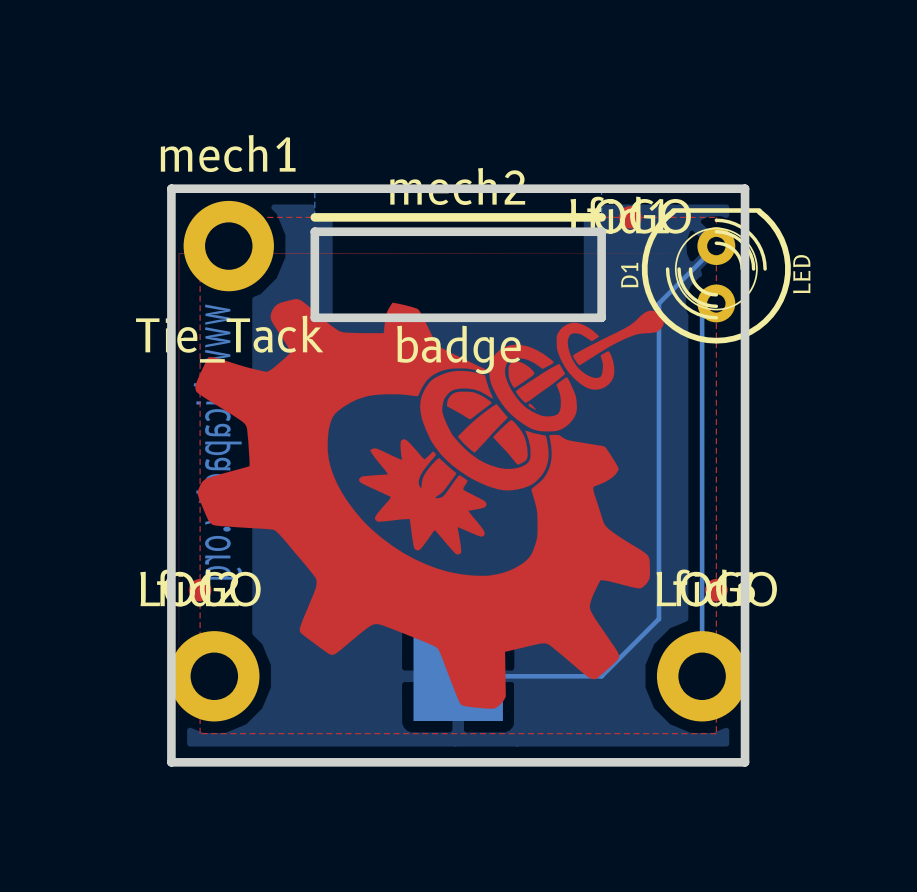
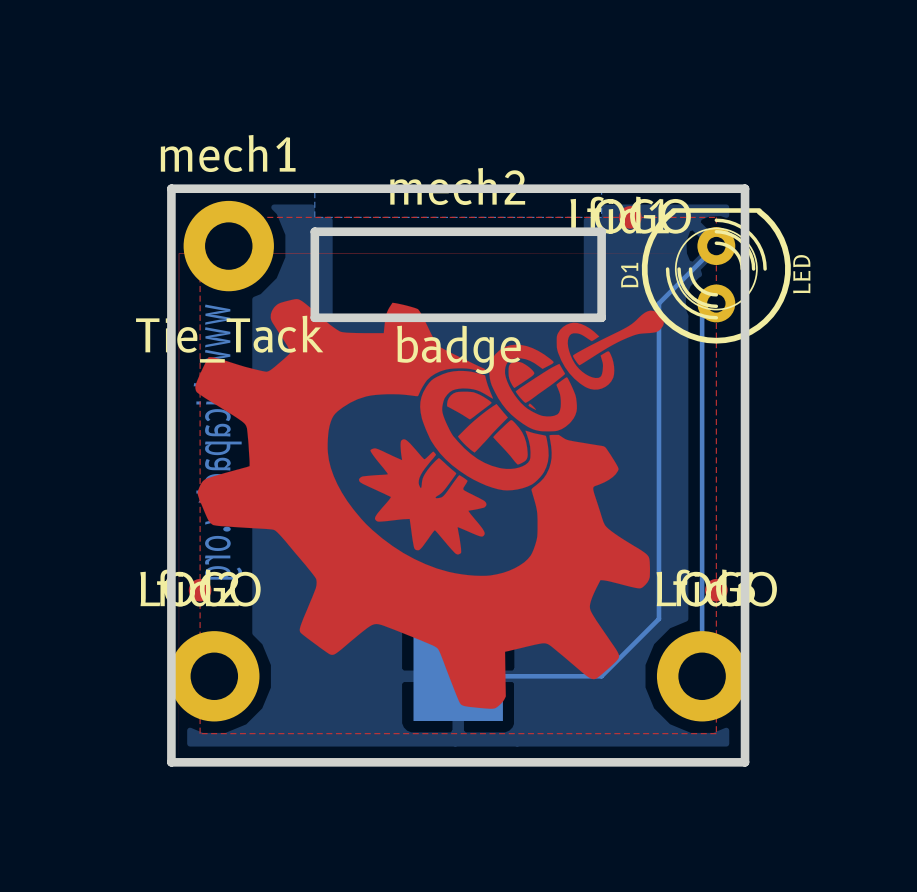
line: (314, 217) (601, 217) -> none

